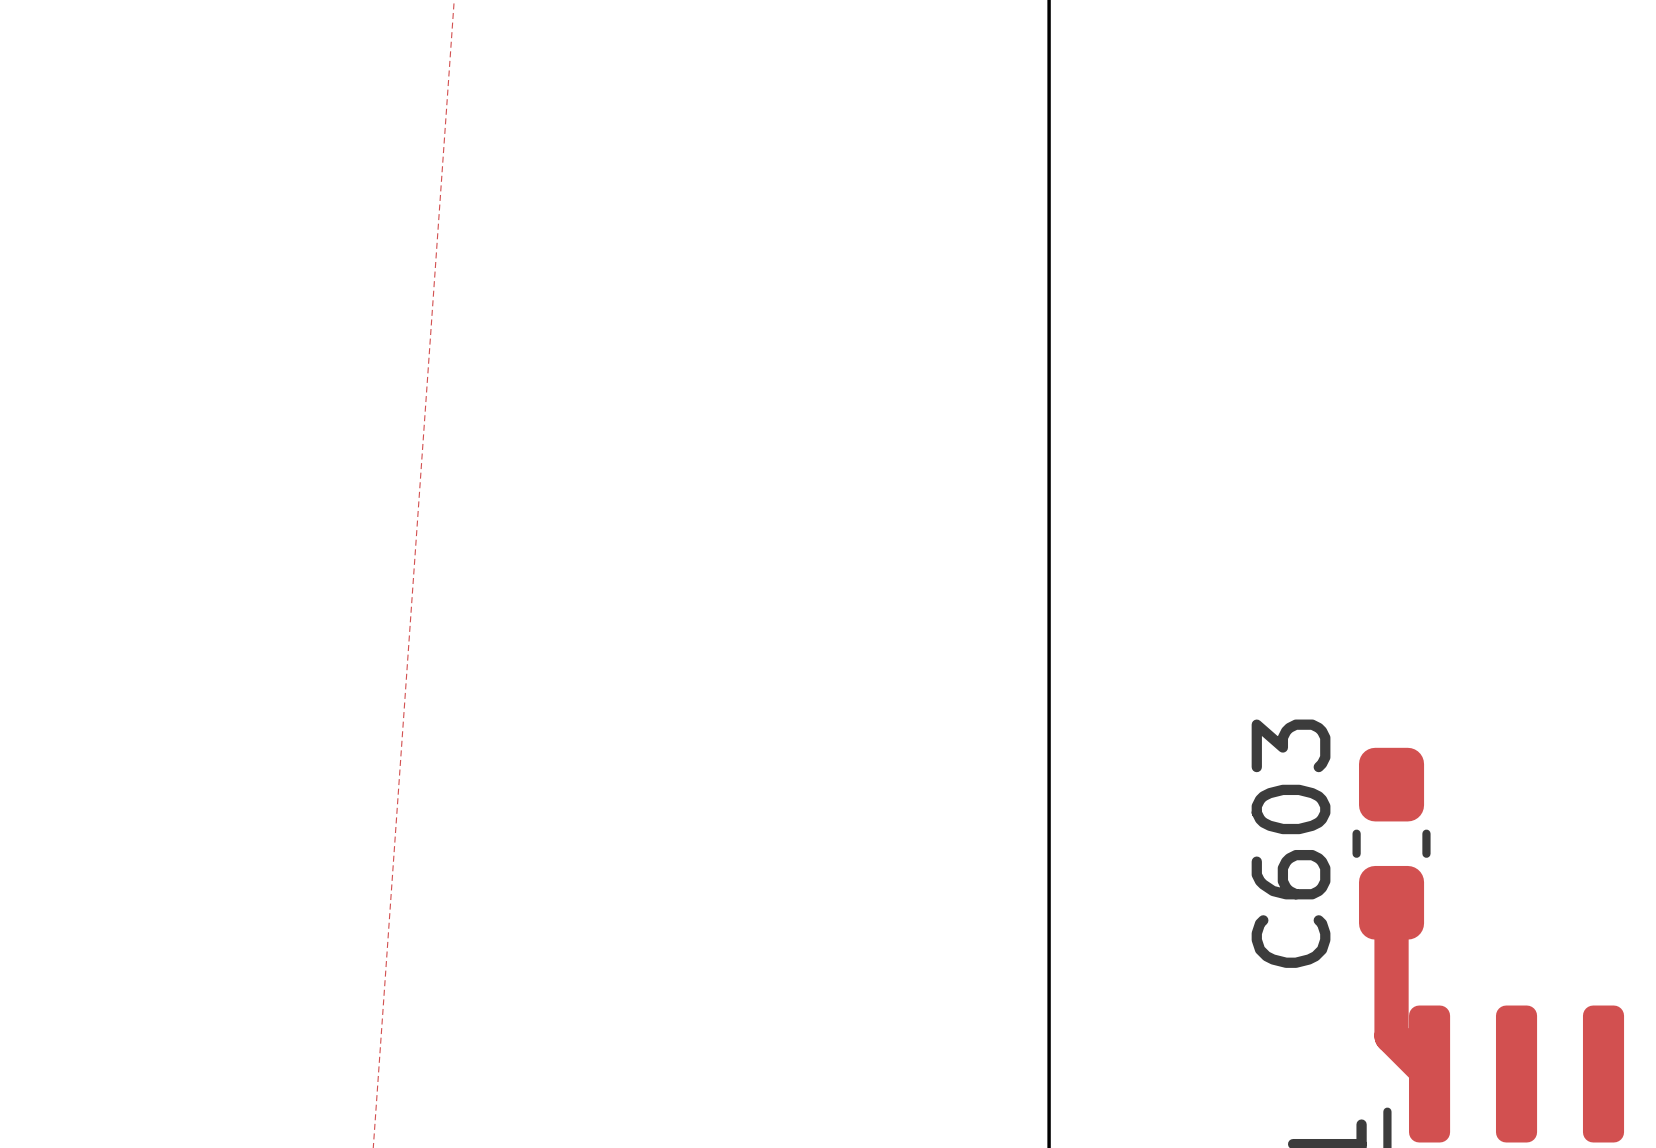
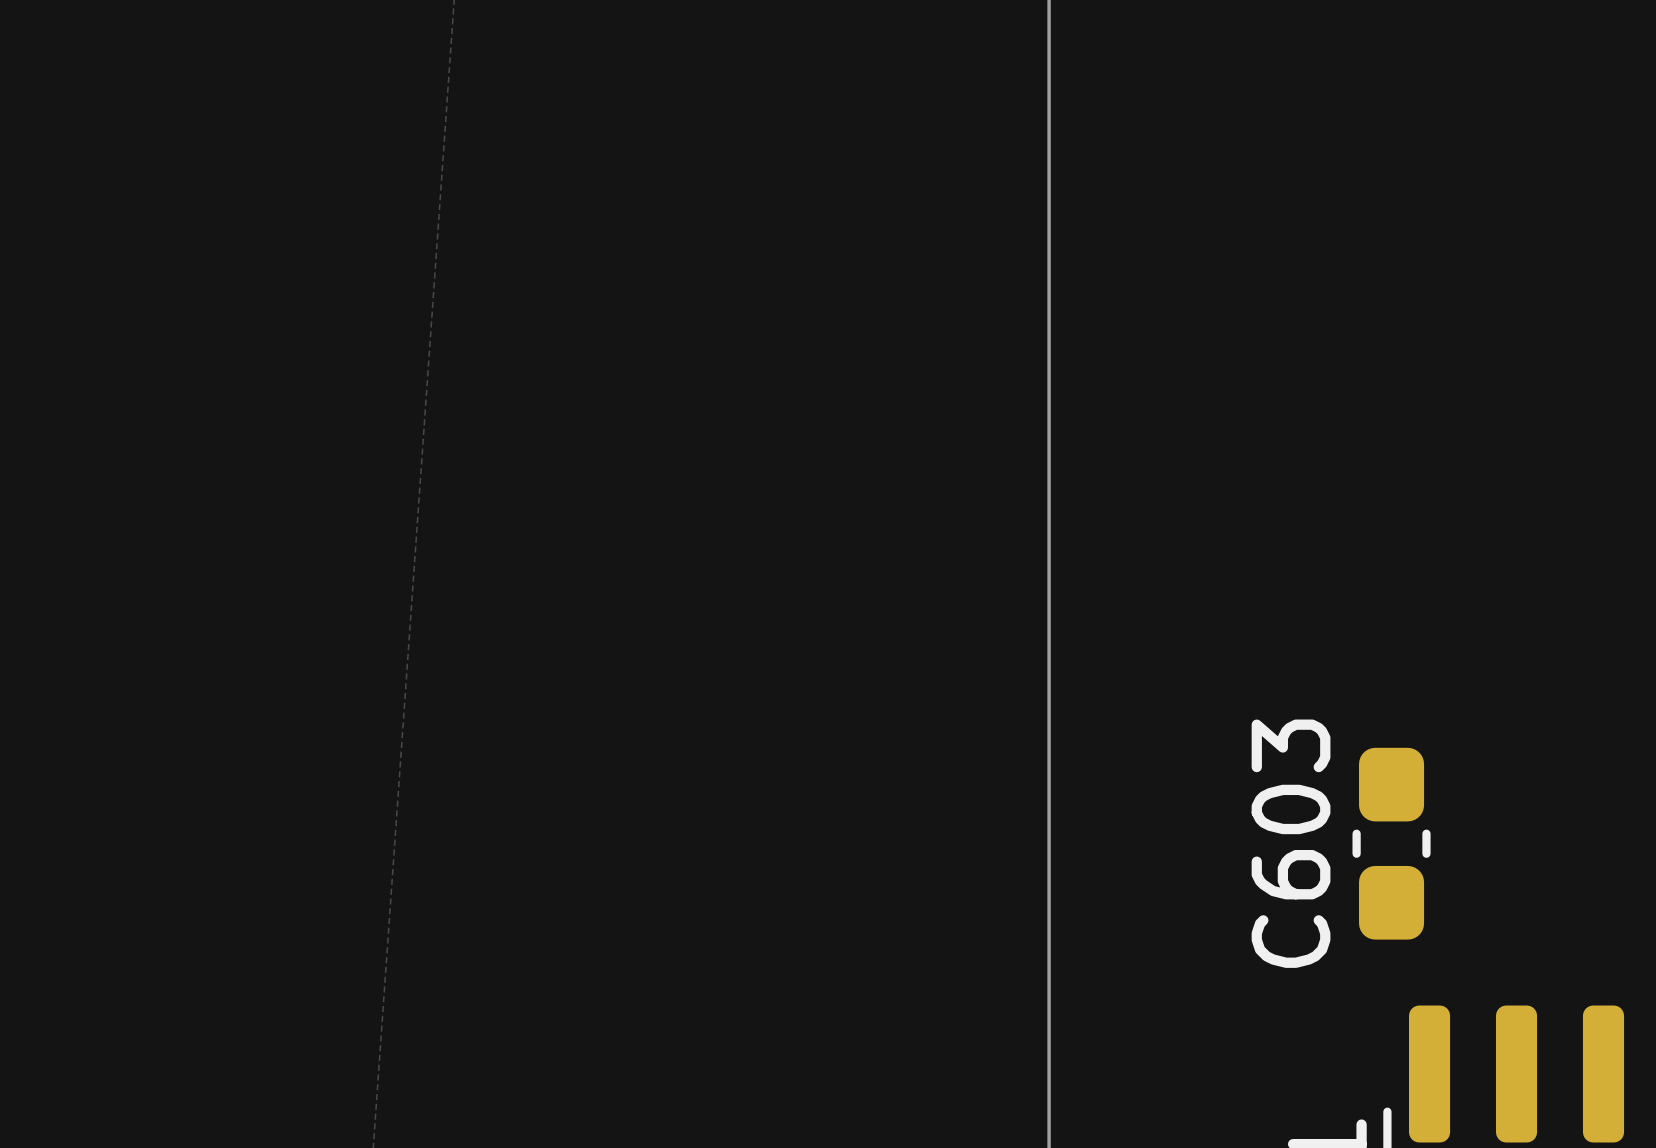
track: (1391, 902) (1391, 1035) (1429, 1074) -> none

